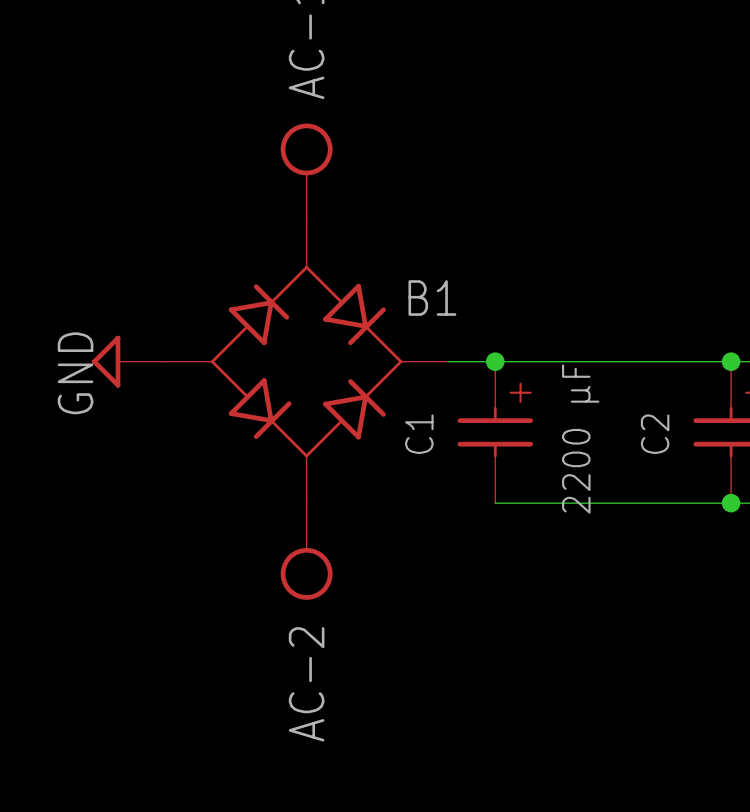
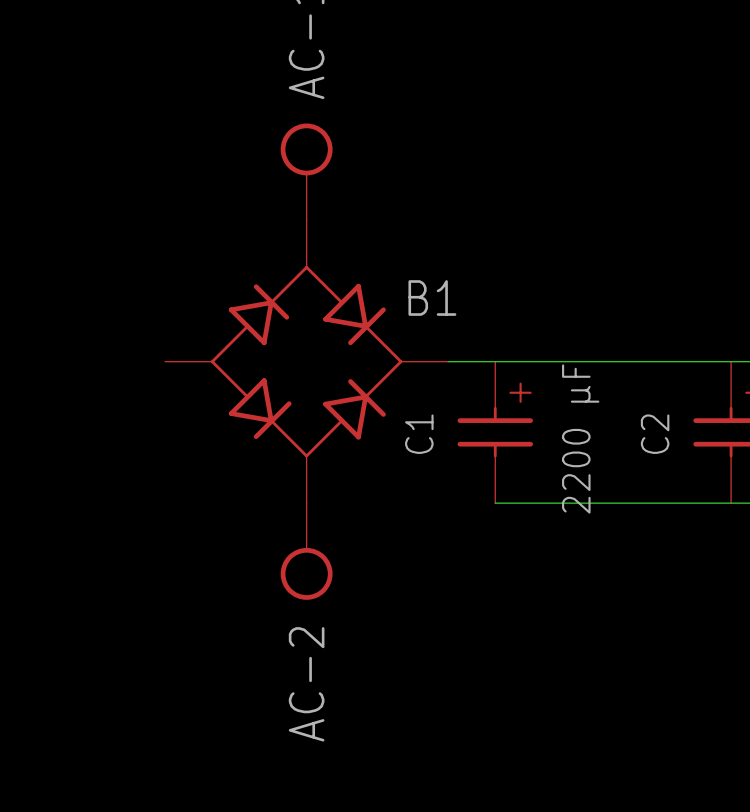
power symbol: GND (128, 361) -> none
junction: (495, 361) -> none
junction: (731, 361) -> none
junction: (731, 503) -> none

